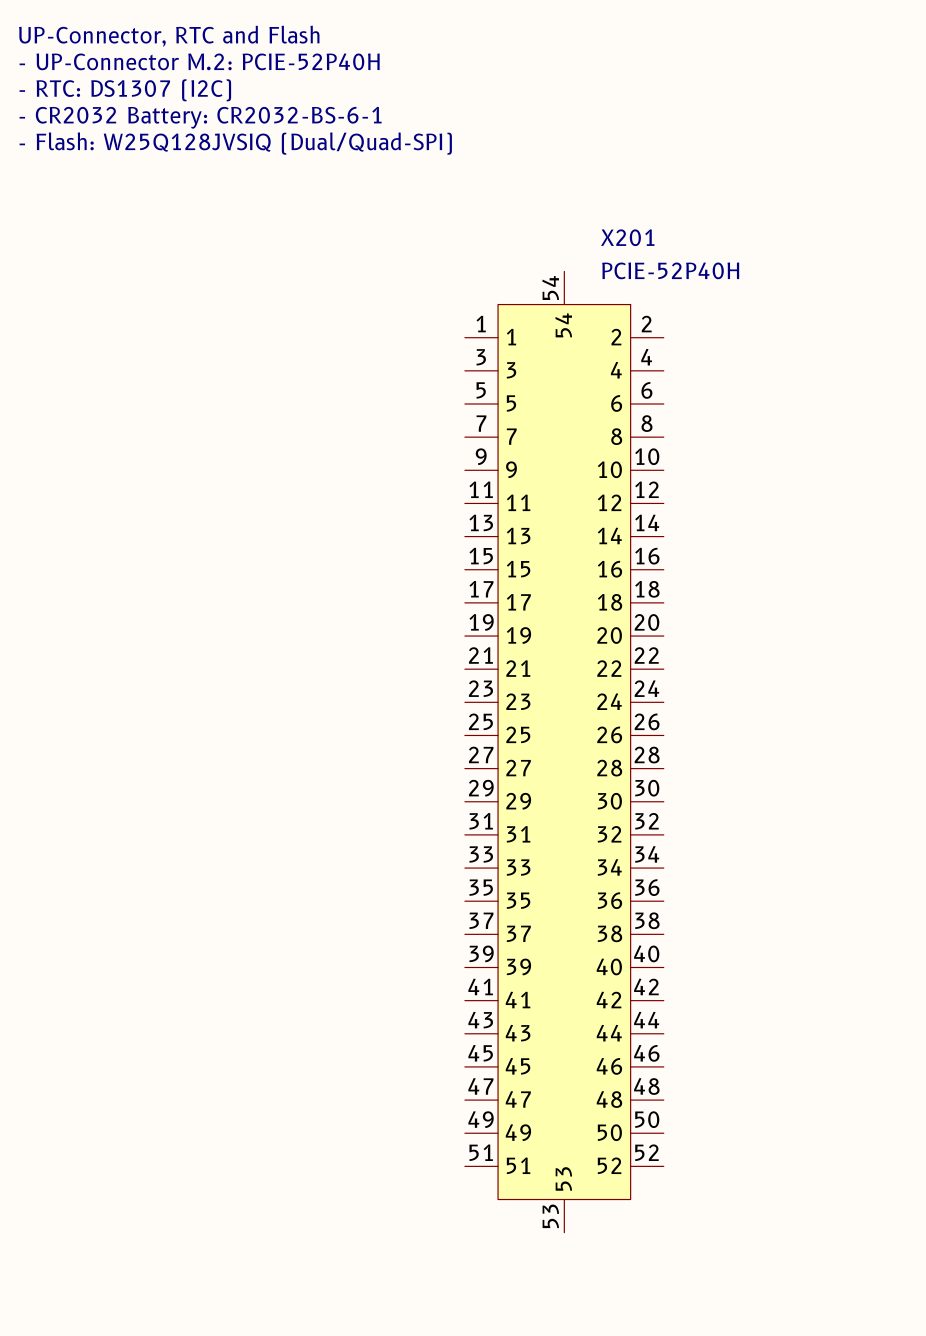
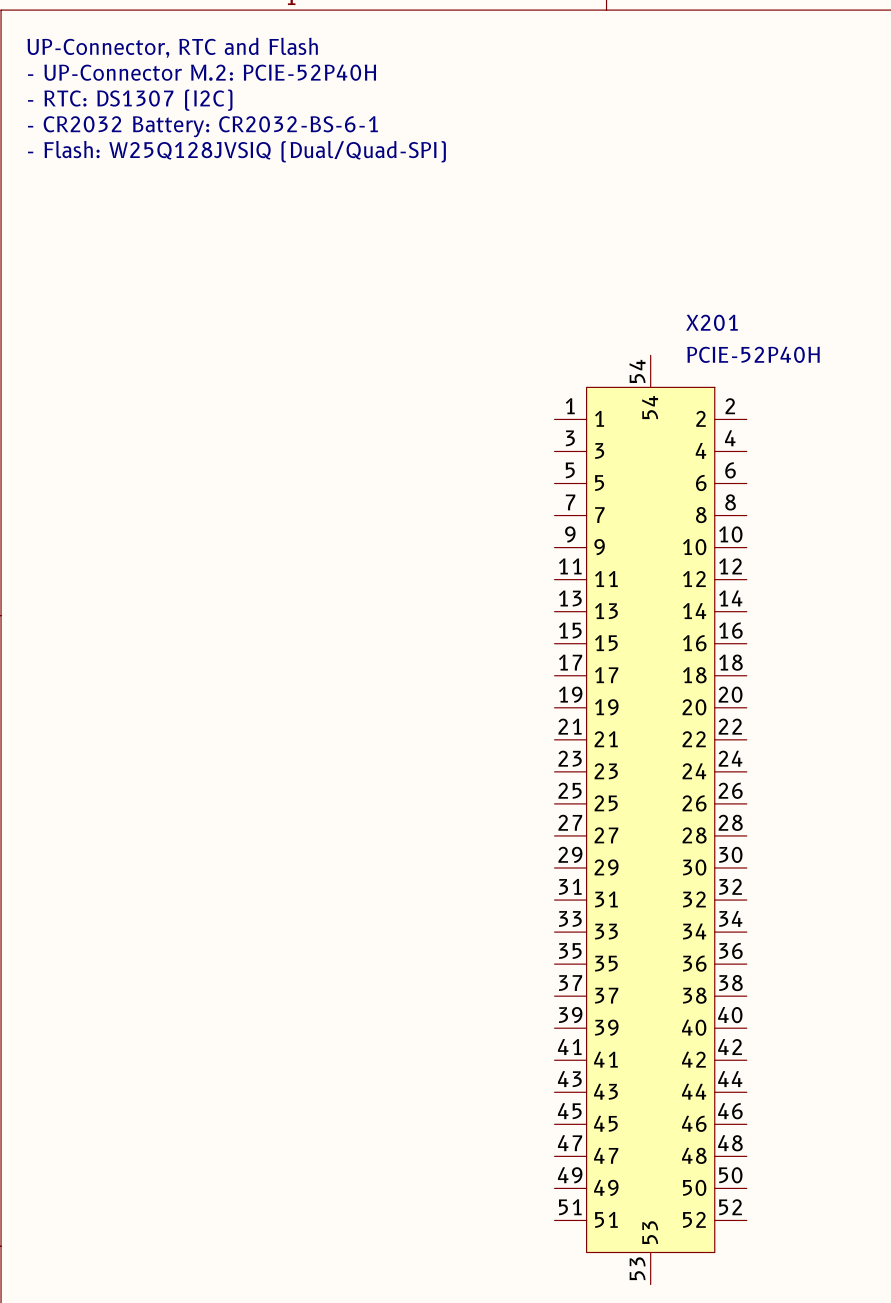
X201 position: (564, 752) -> (650, 819)

